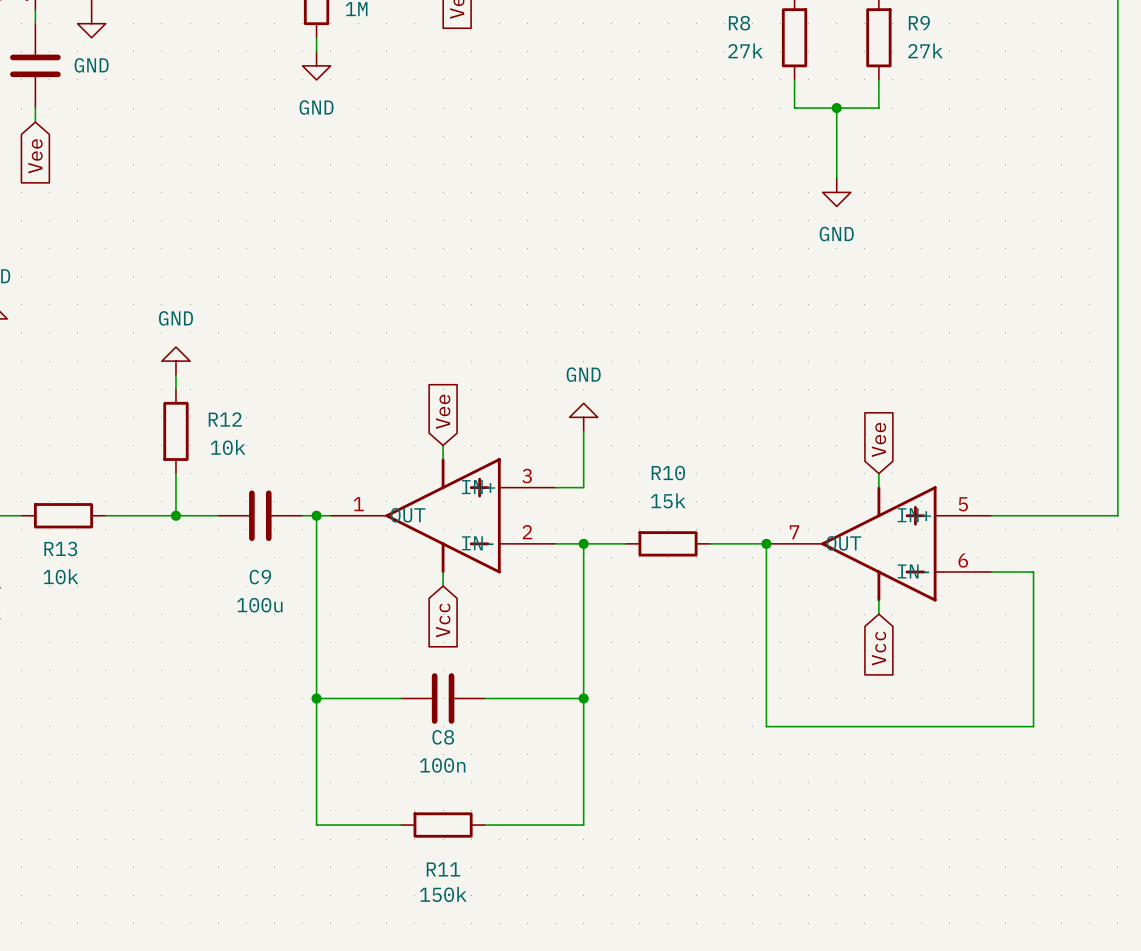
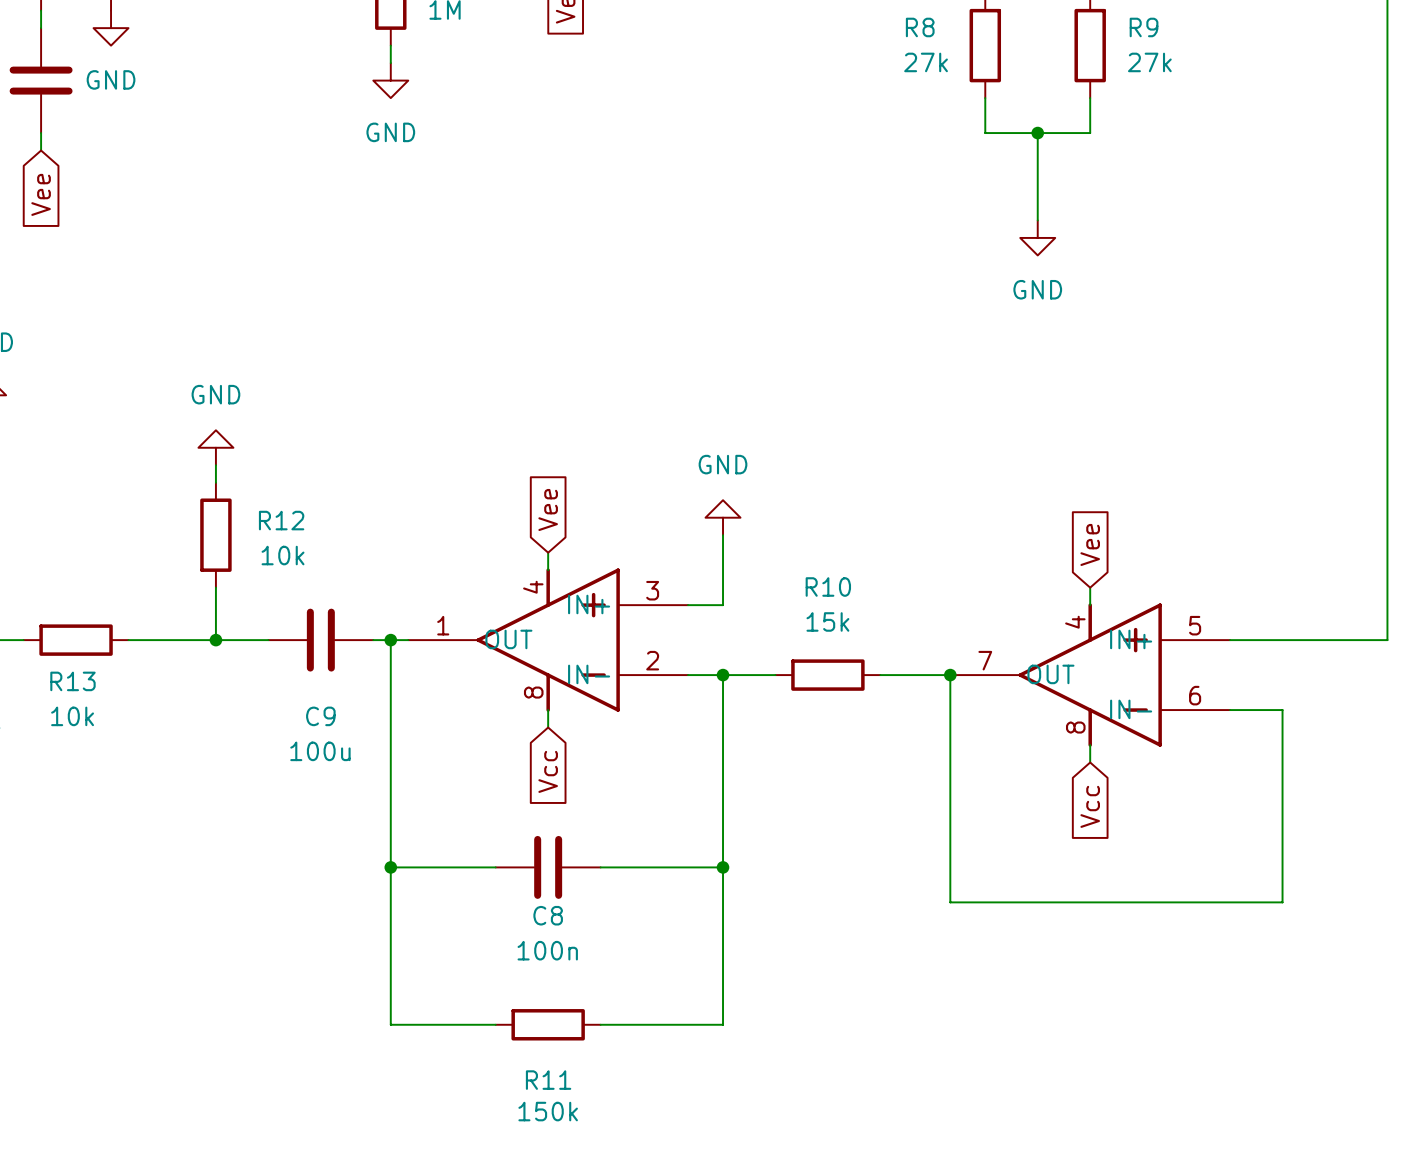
part symbol: [330, 458, 556, 574] -> [408, 568, 689, 712]
part symbol: [766, 486, 992, 602] -> [950, 603, 1231, 747]

